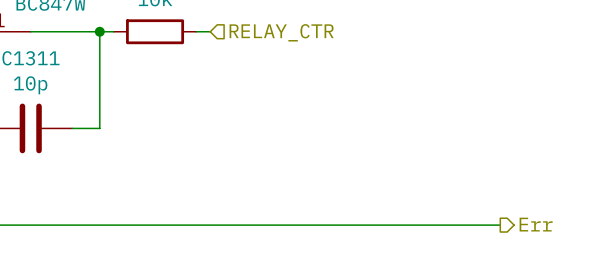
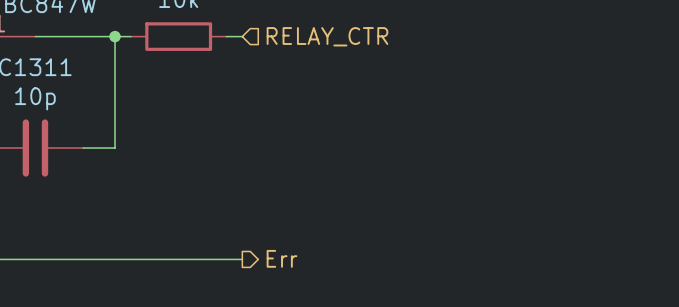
hierarchical label: none -> Err (282, 258)
hierarchical label: Err (536, 224) -> none
wire: (210, 225) (500, 225) -> none

